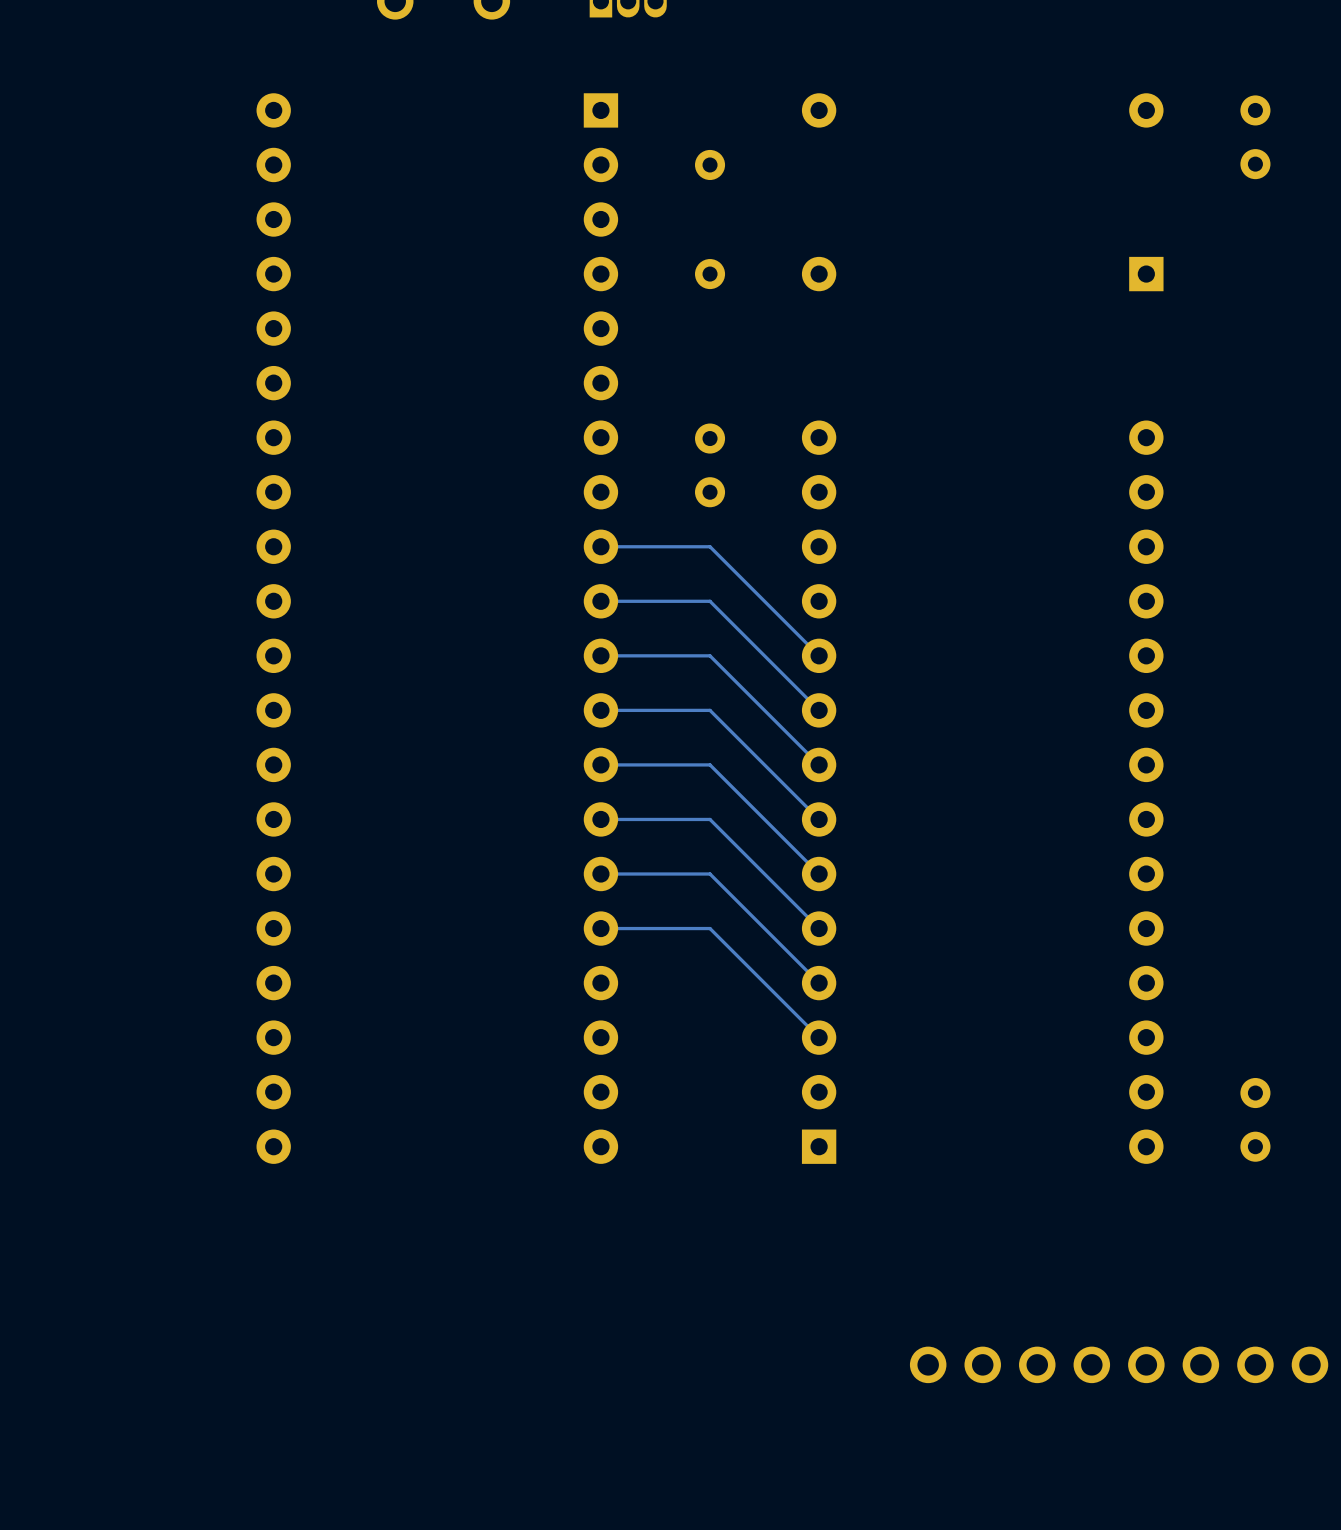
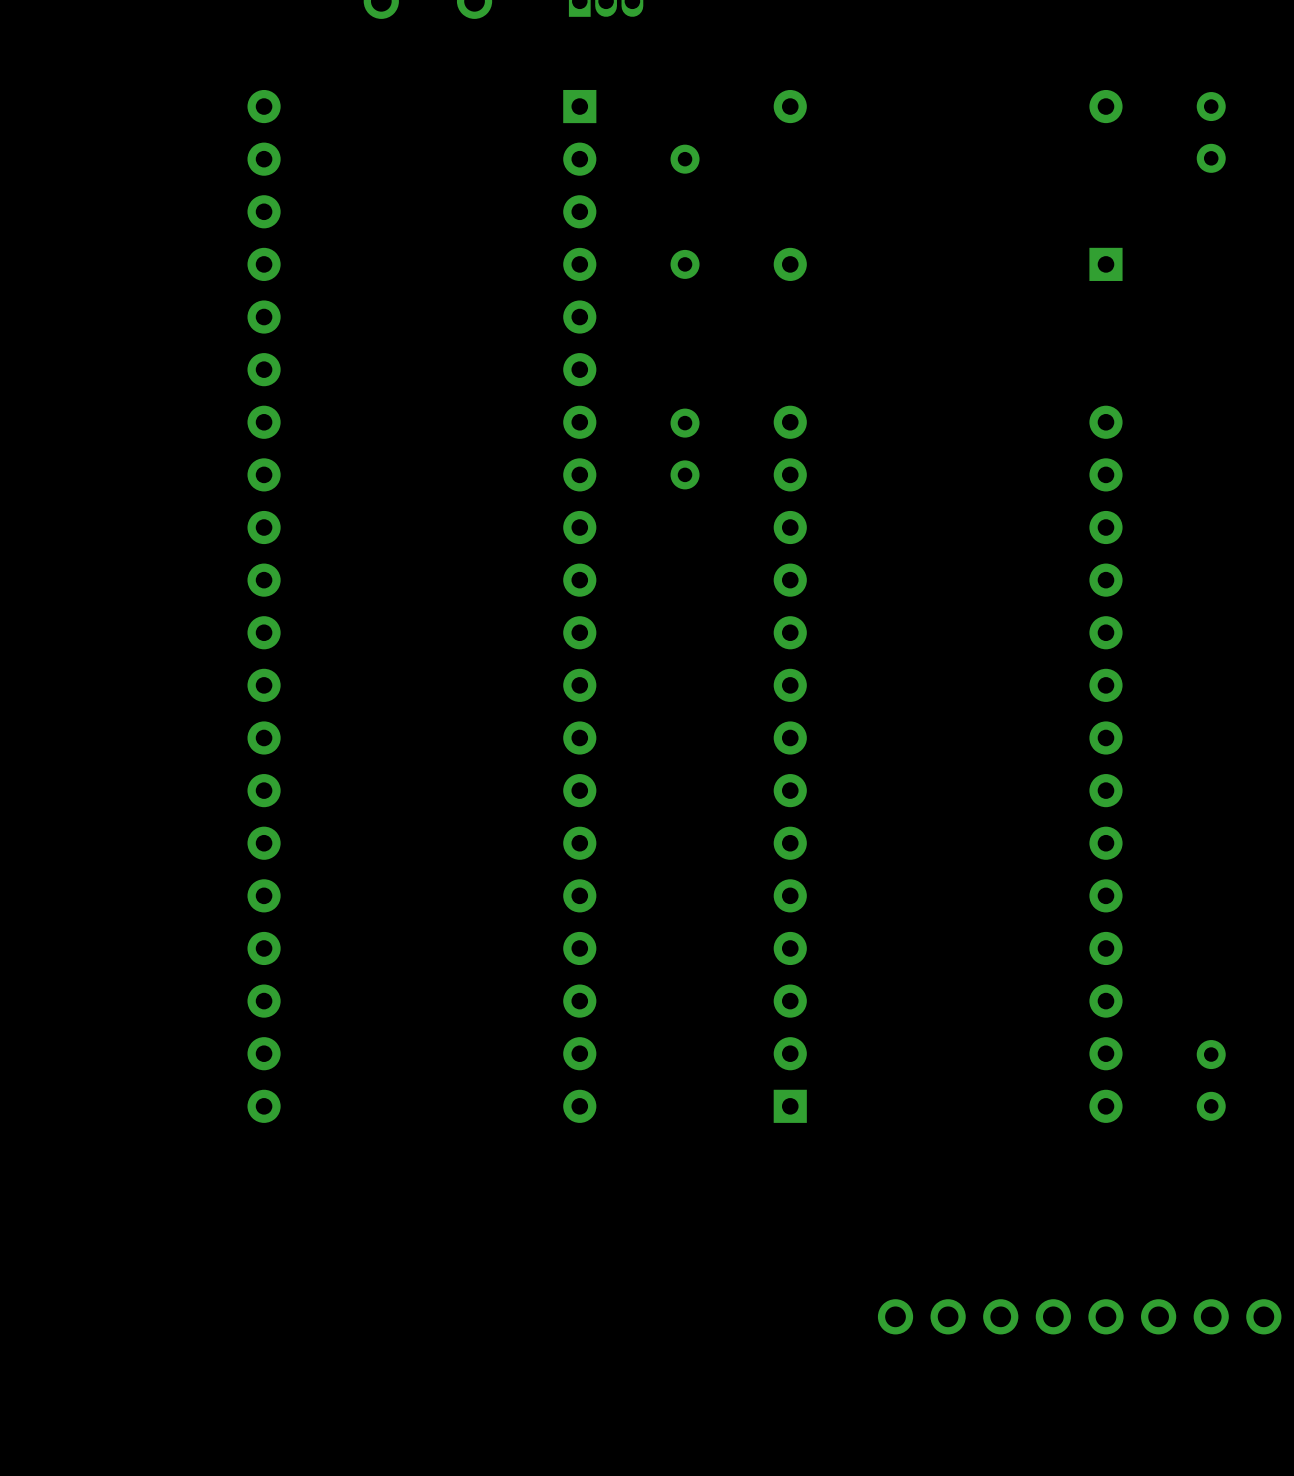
track: (600, 546) (710, 546) (819, 655) -> none
track: (600, 601) (710, 601) (819, 710) -> none
track: (600, 655) (710, 655) (819, 764) -> none
track: (600, 710) (710, 710) (819, 819) -> none
track: (600, 764) (710, 764) (819, 874) -> none
track: (600, 819) (710, 819) (819, 928) -> none
track: (600, 874) (710, 874) (819, 983) -> none
track: (600, 928) (710, 928) (819, 1037) -> none

